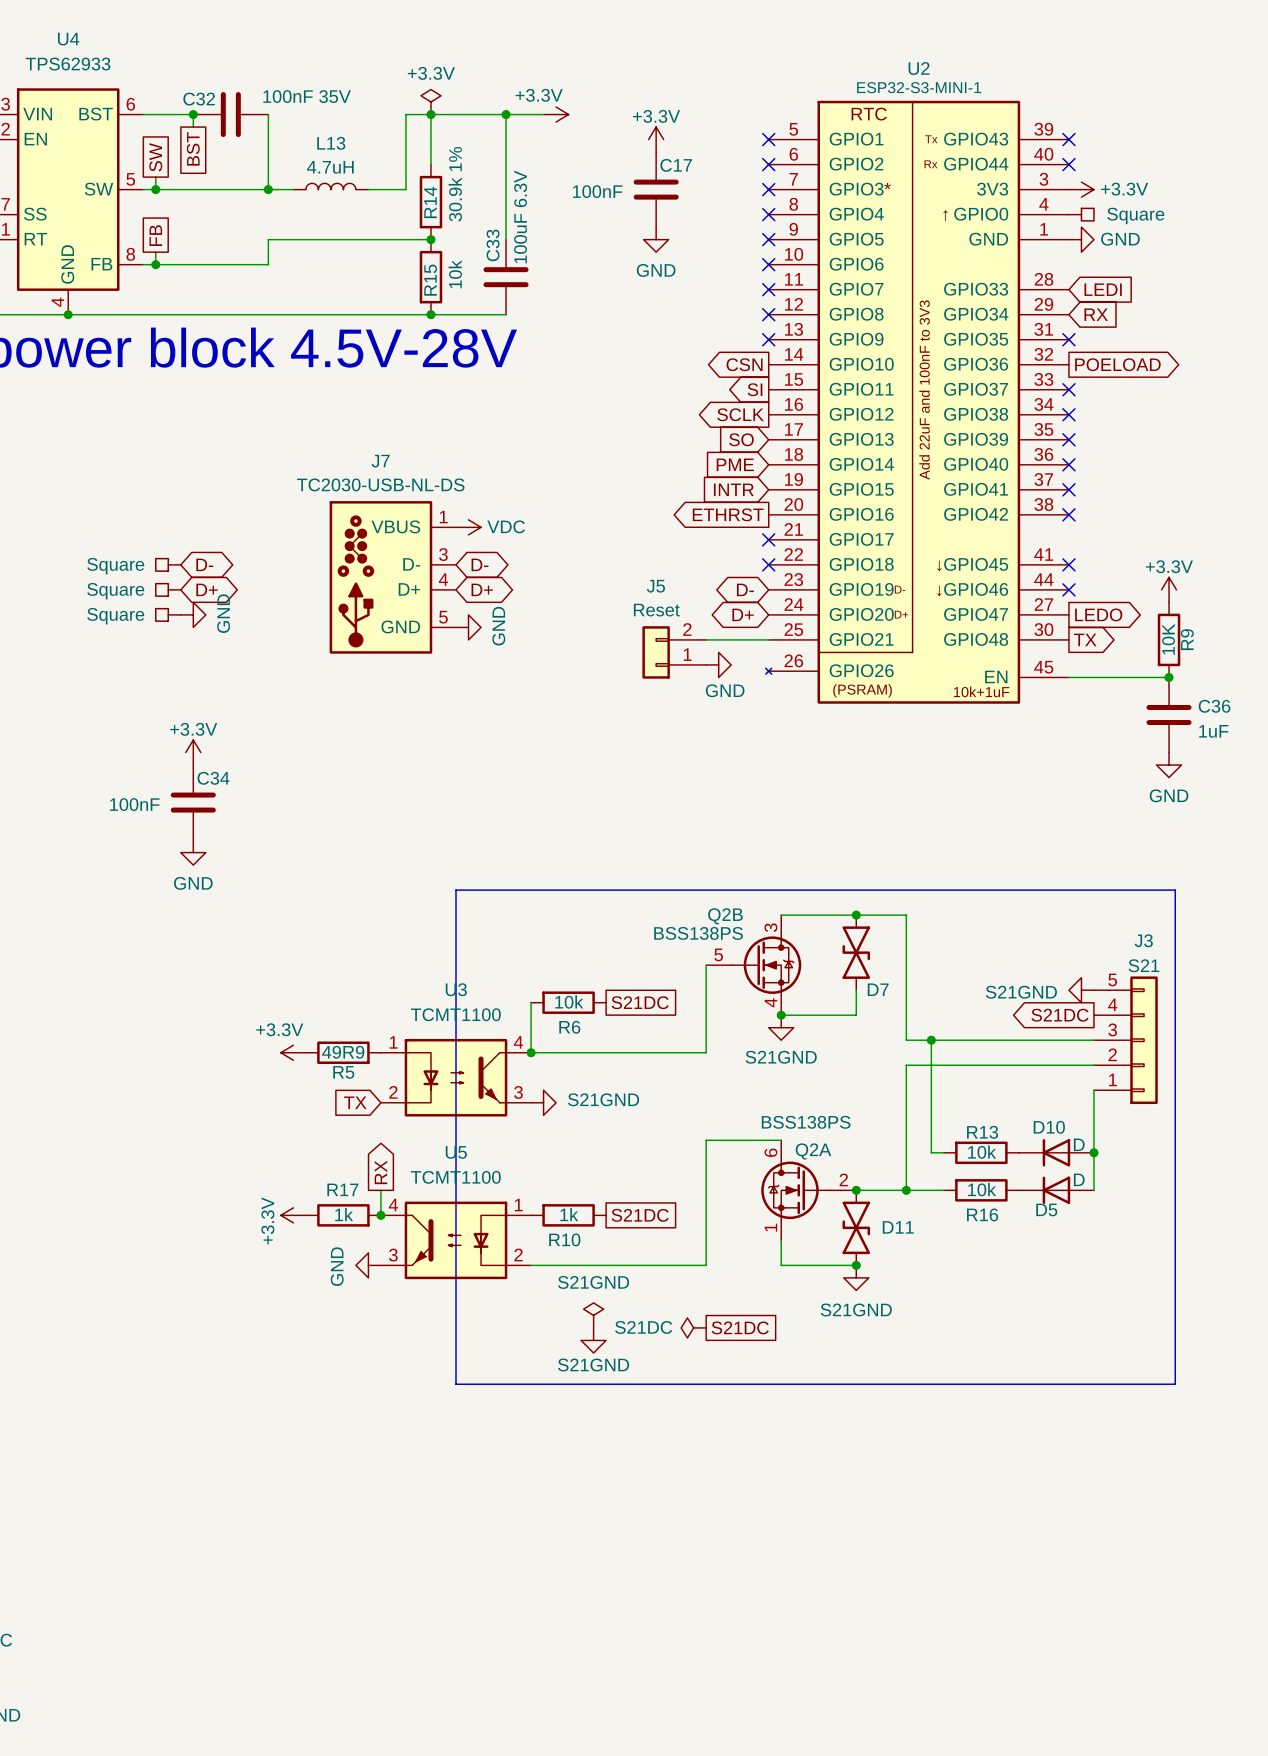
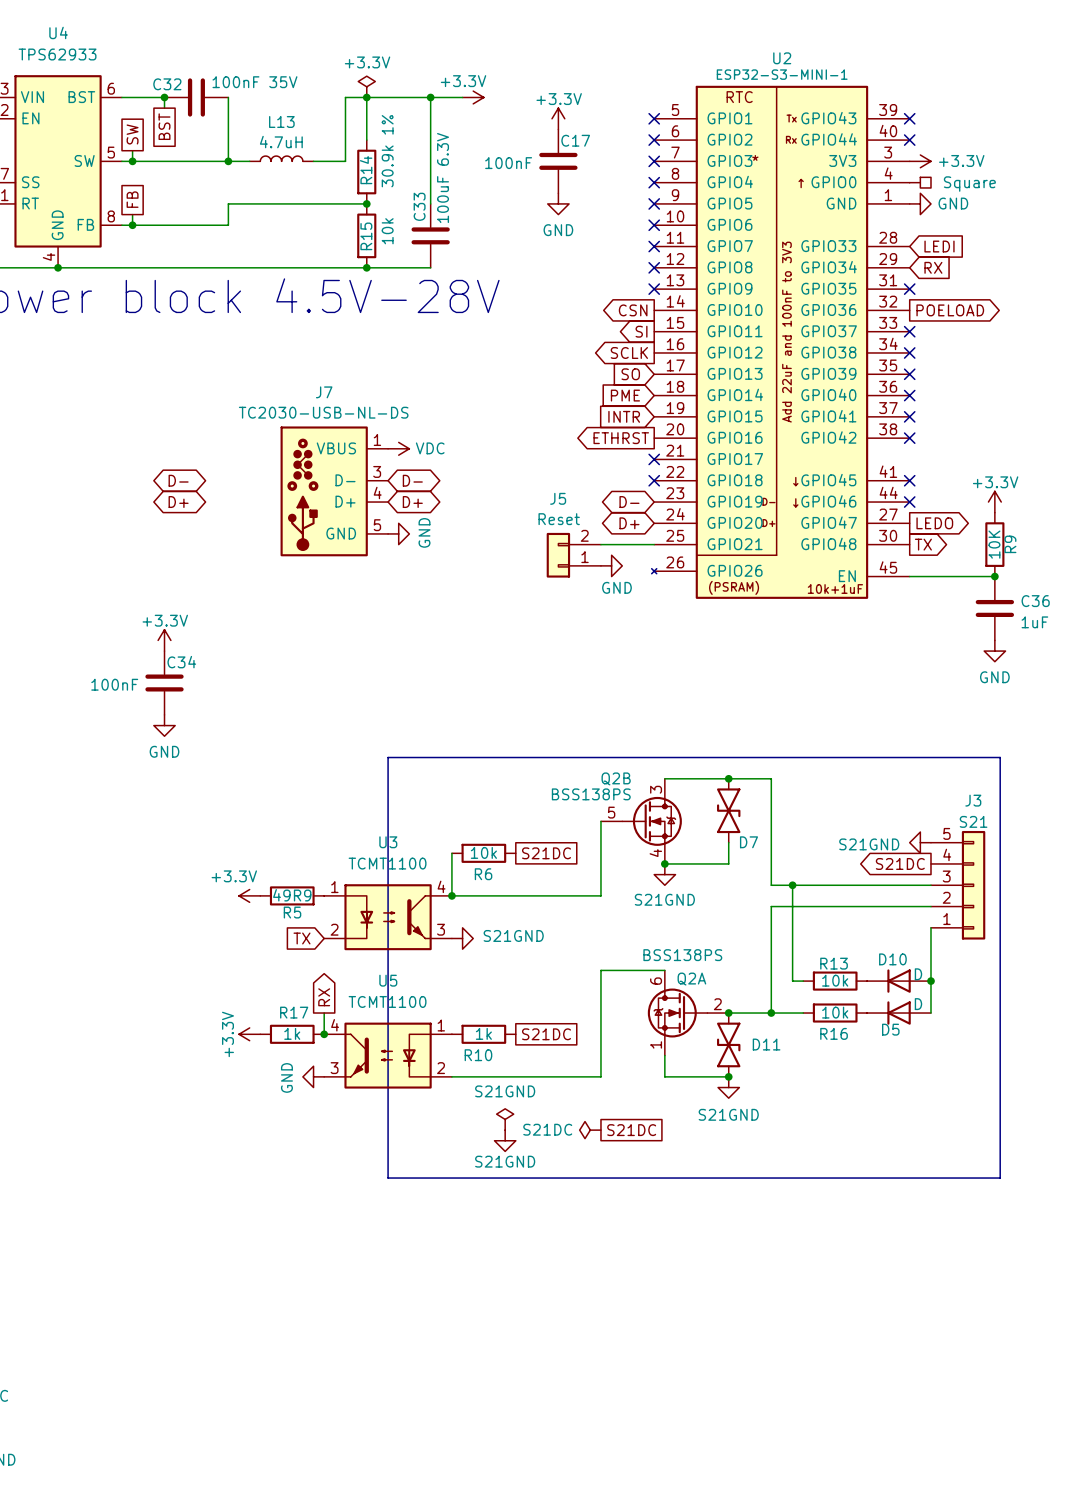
part: Square (167, 564) -> none
part: Square (167, 589) -> none
part: Square (167, 614) -> none
power symbol: GND (193, 614) -> none

